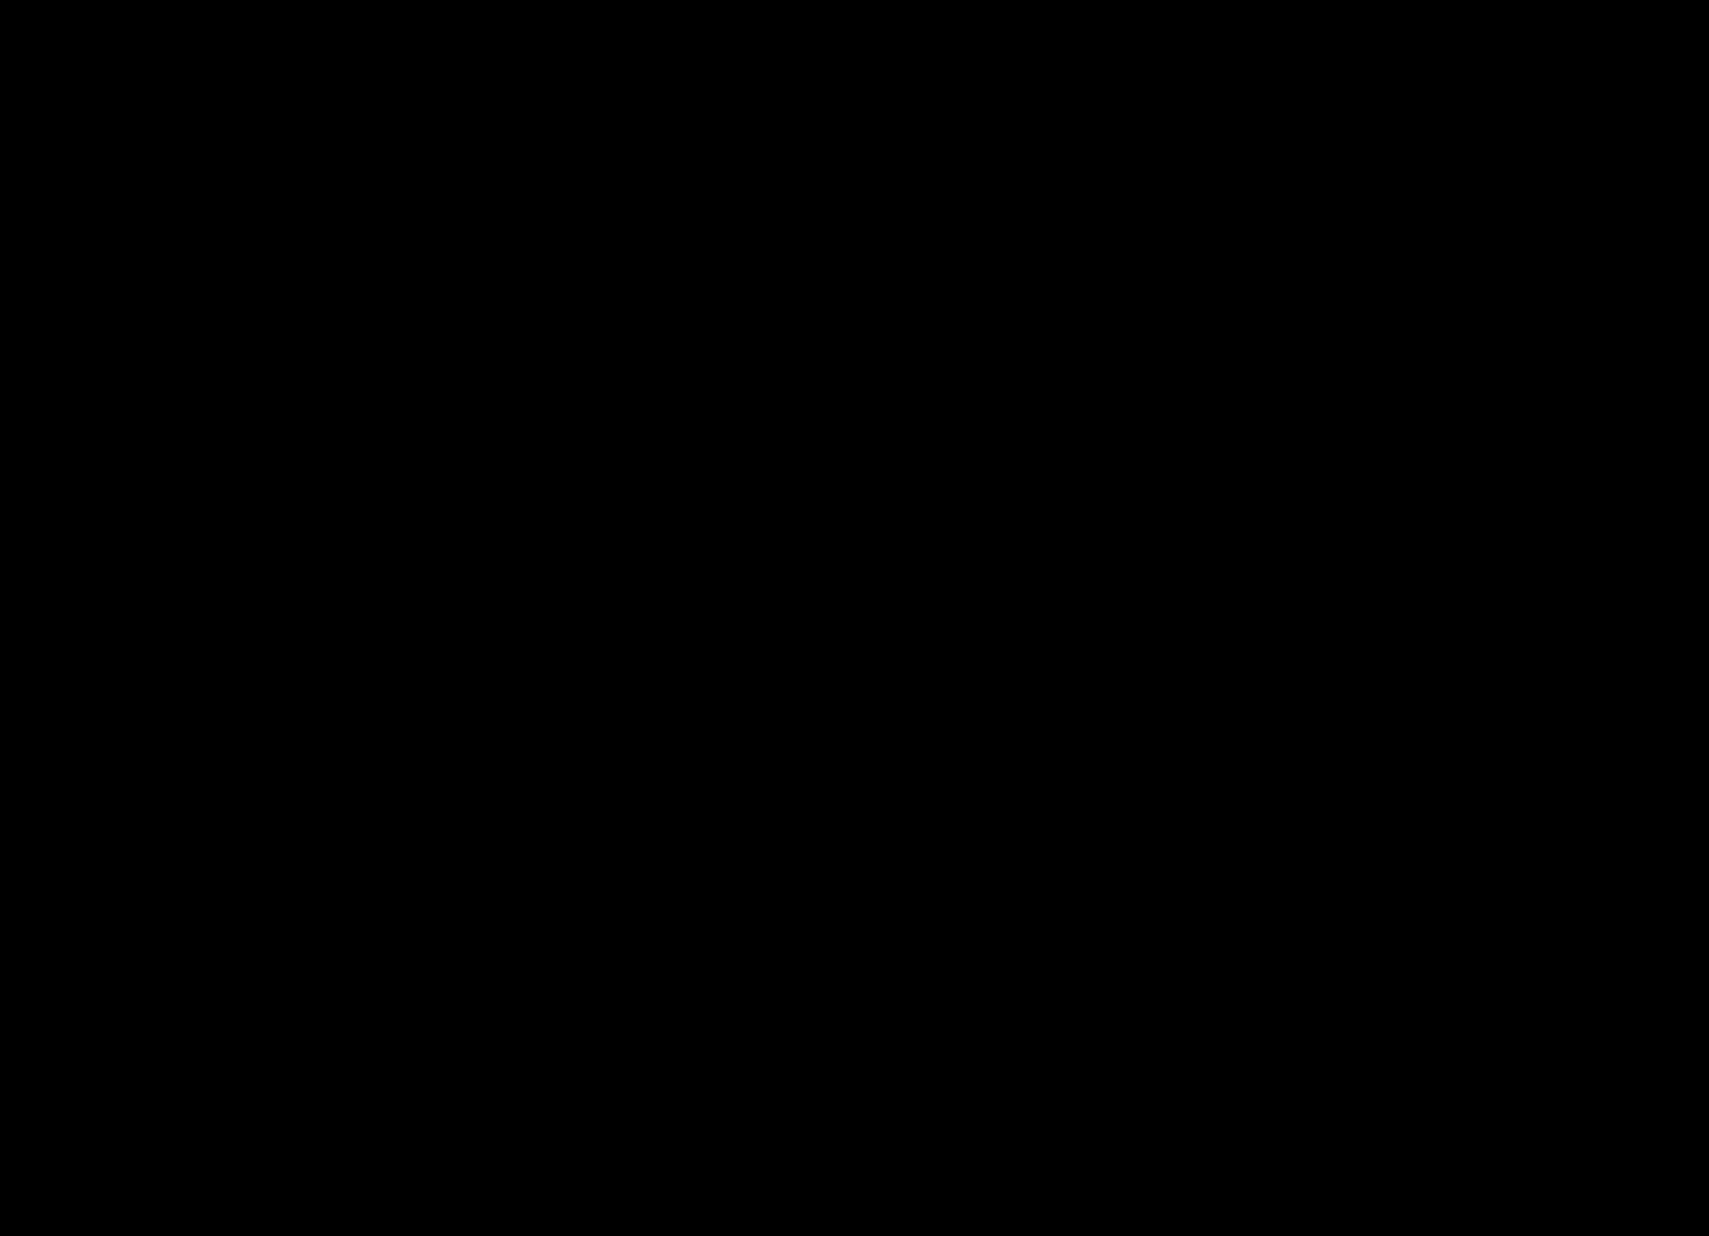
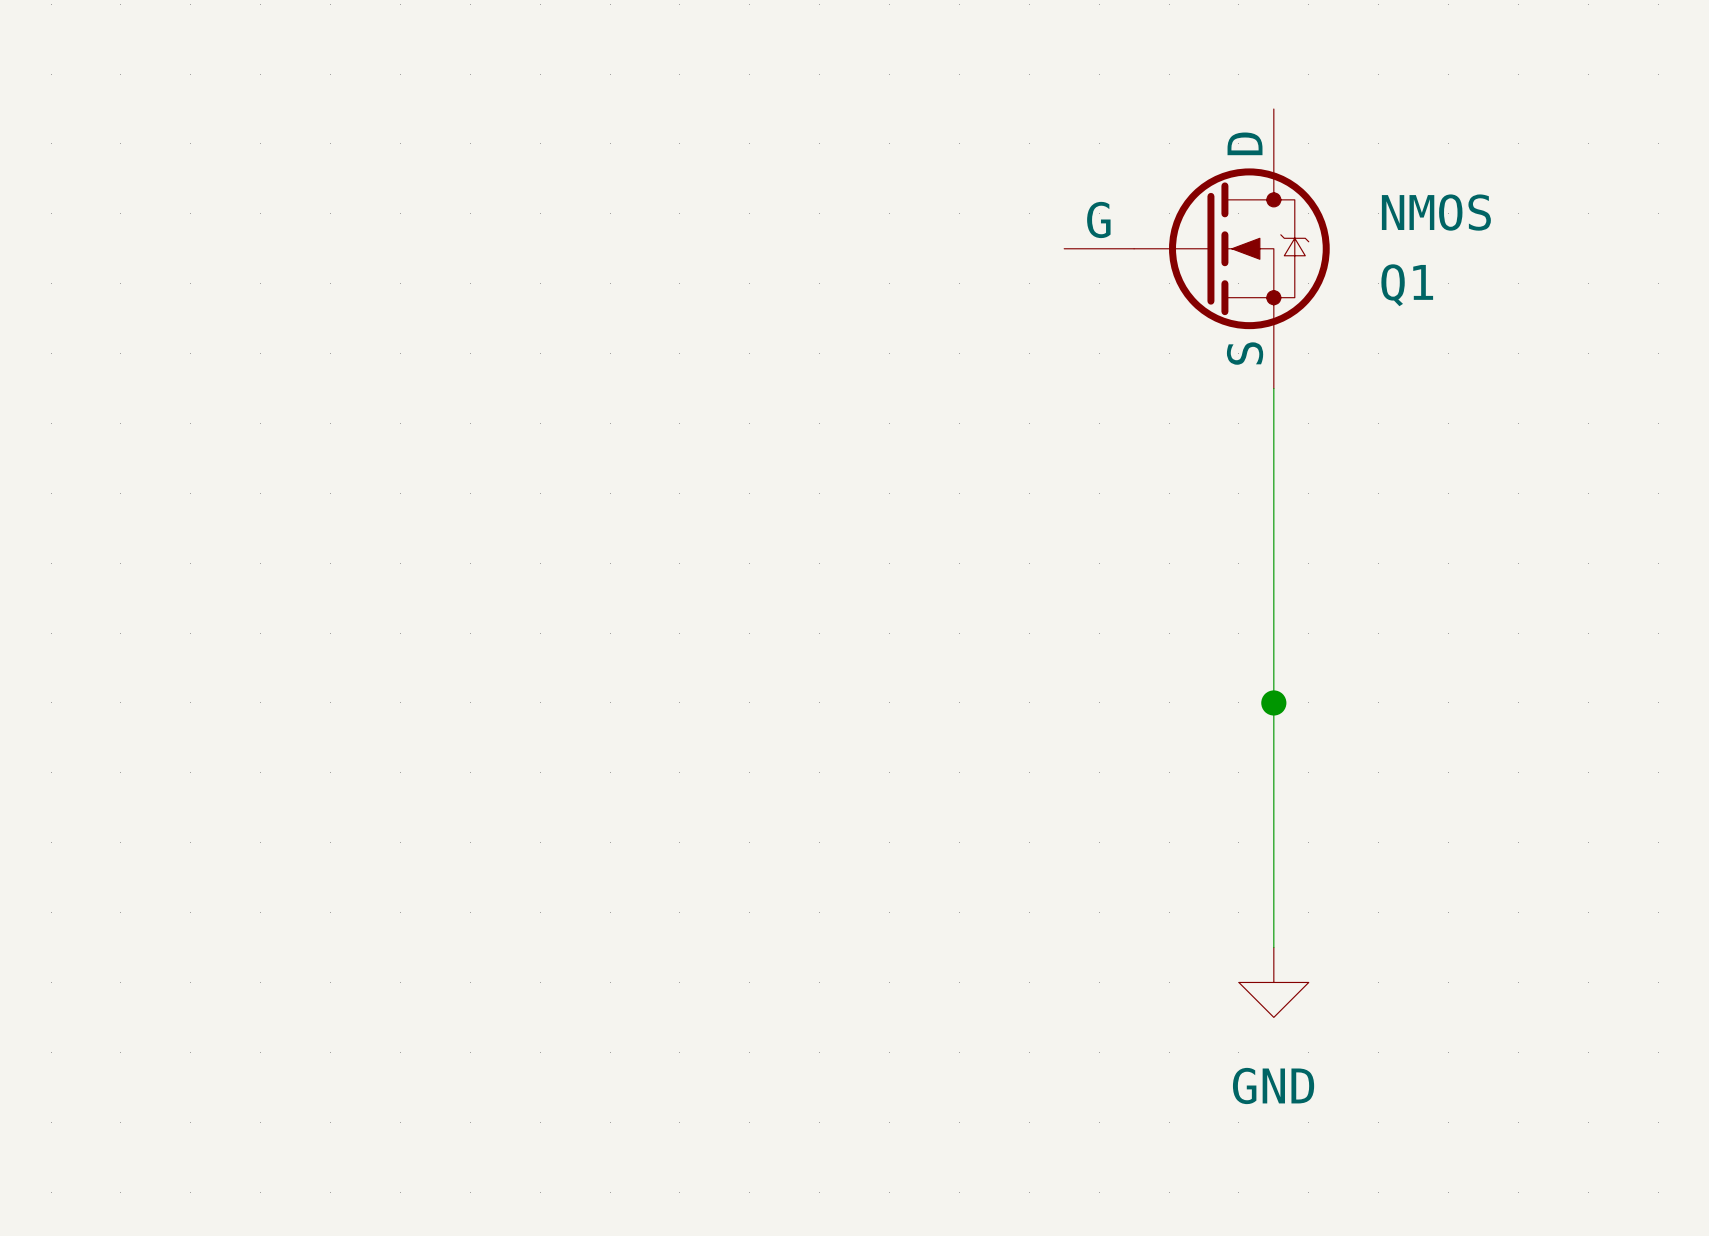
Q1: none -> NMOS (1196, 248)
wire: none -> (1273, 388) (1273, 947)
junction: none -> (1273, 702)
power symbol: none -> GND (1273, 982)

